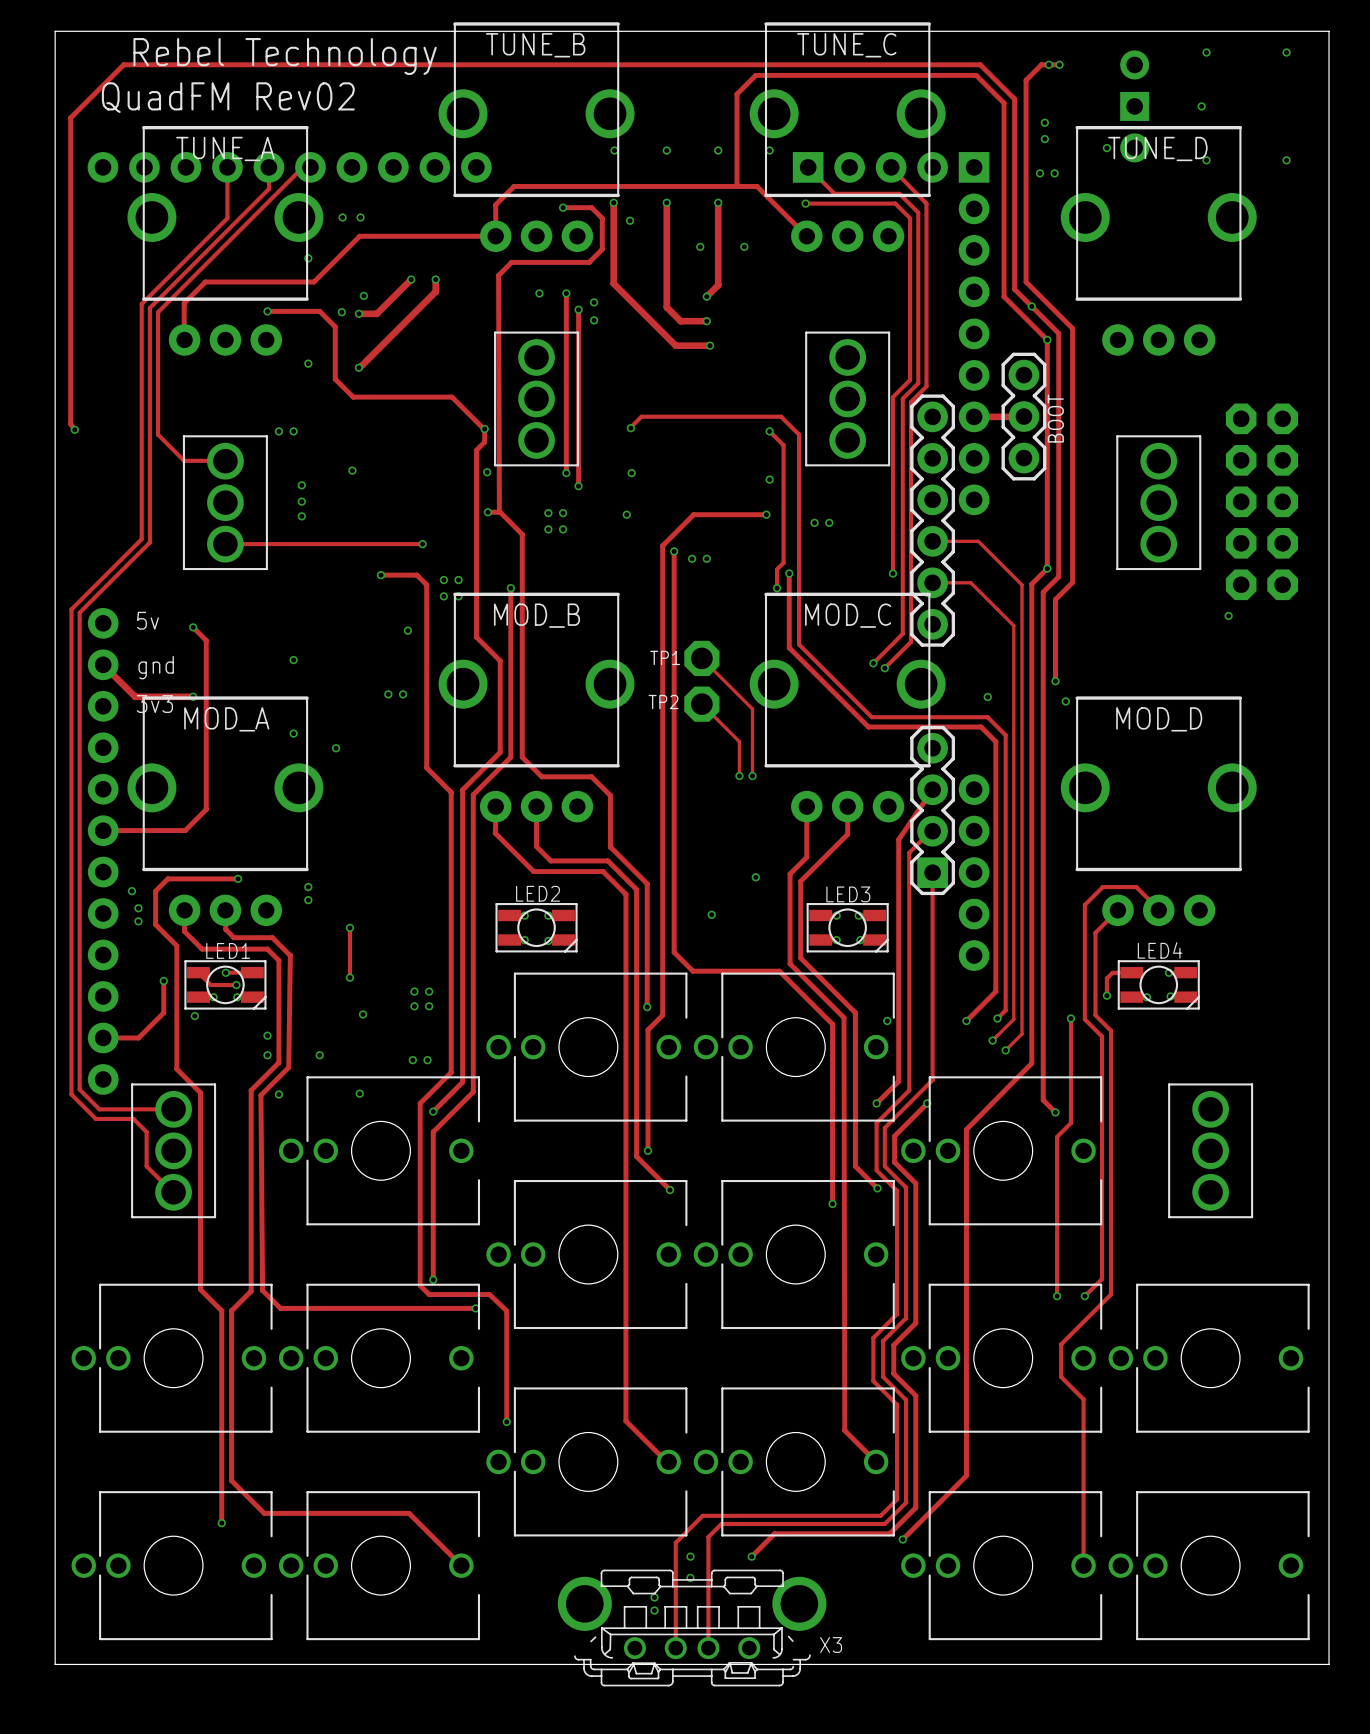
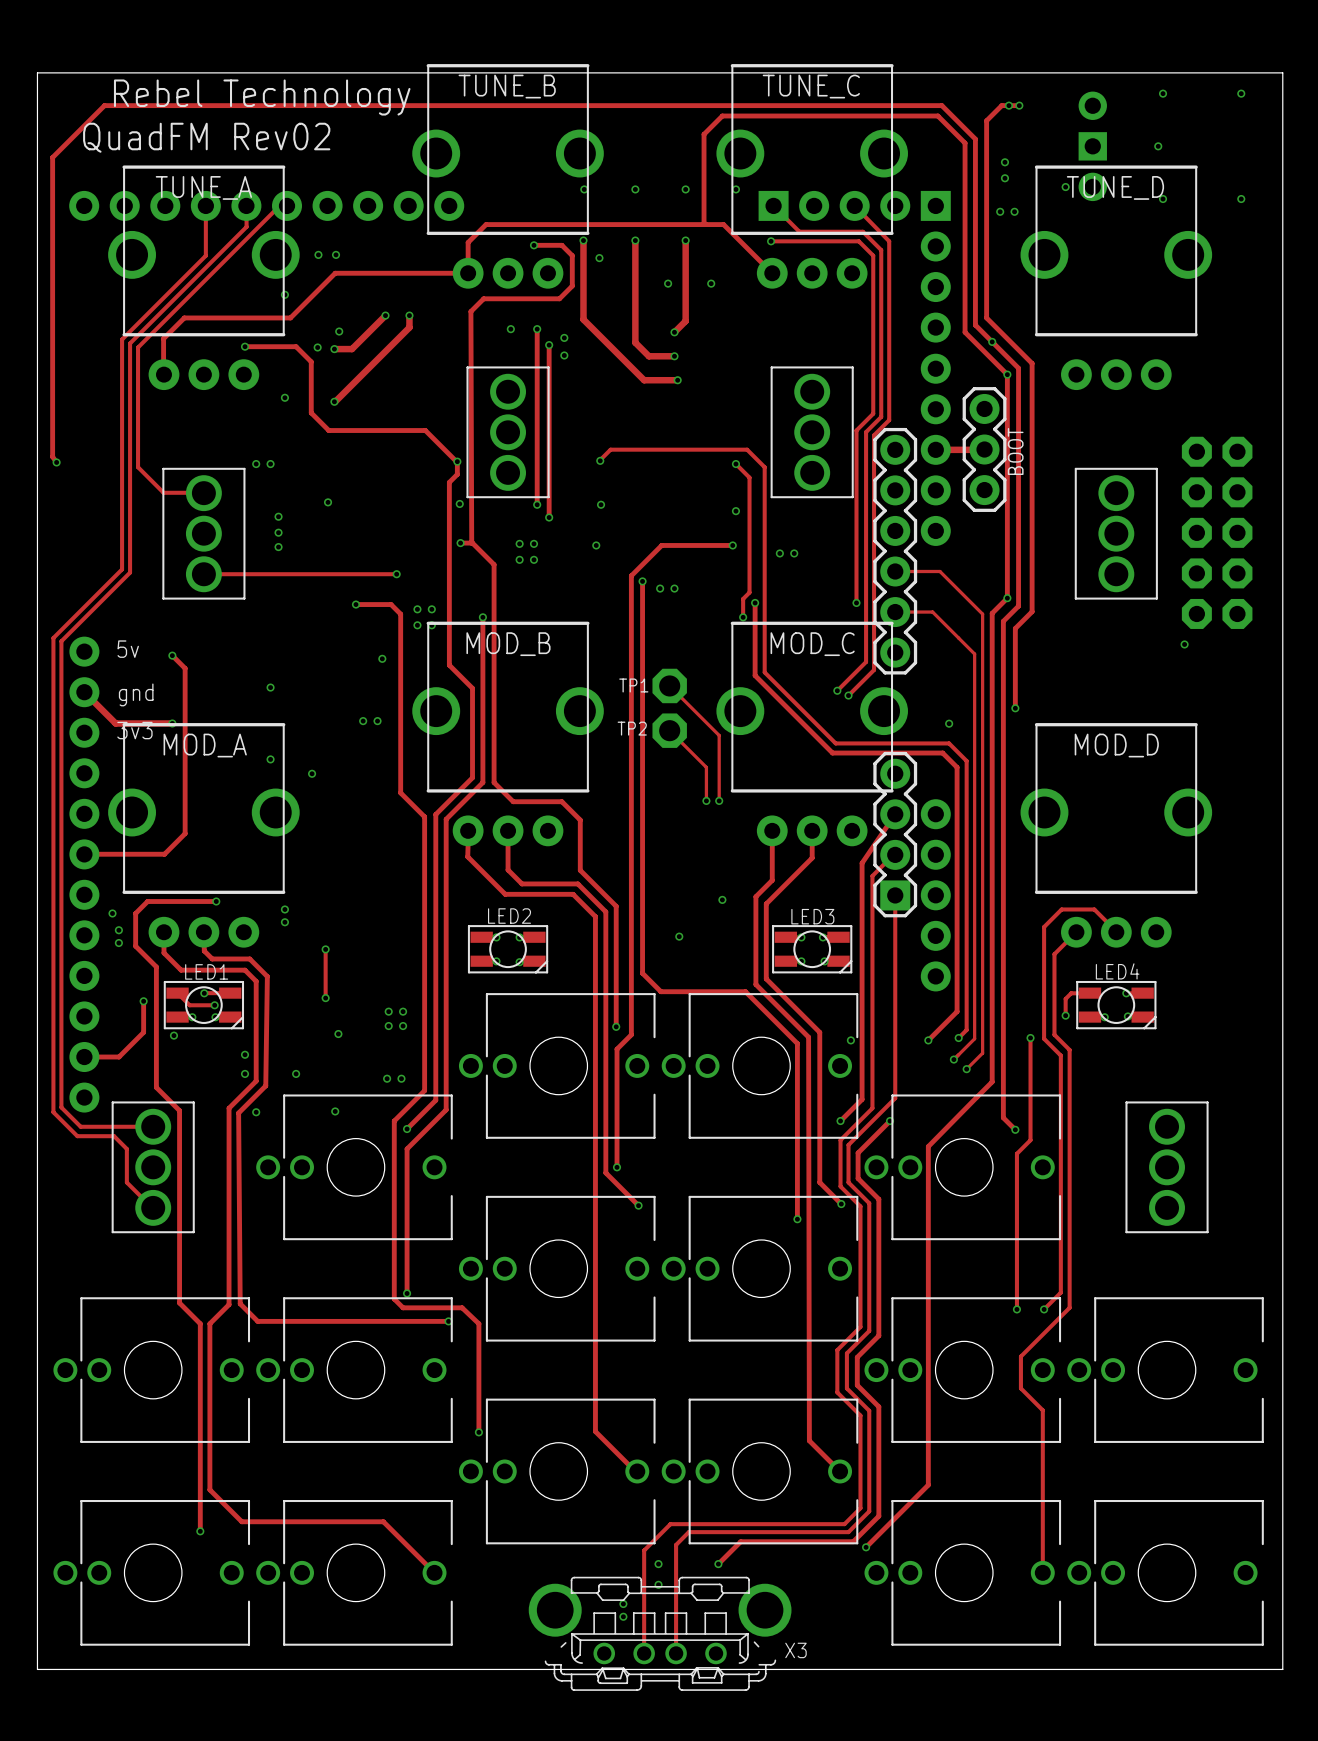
via: (1065, 701) -> none

